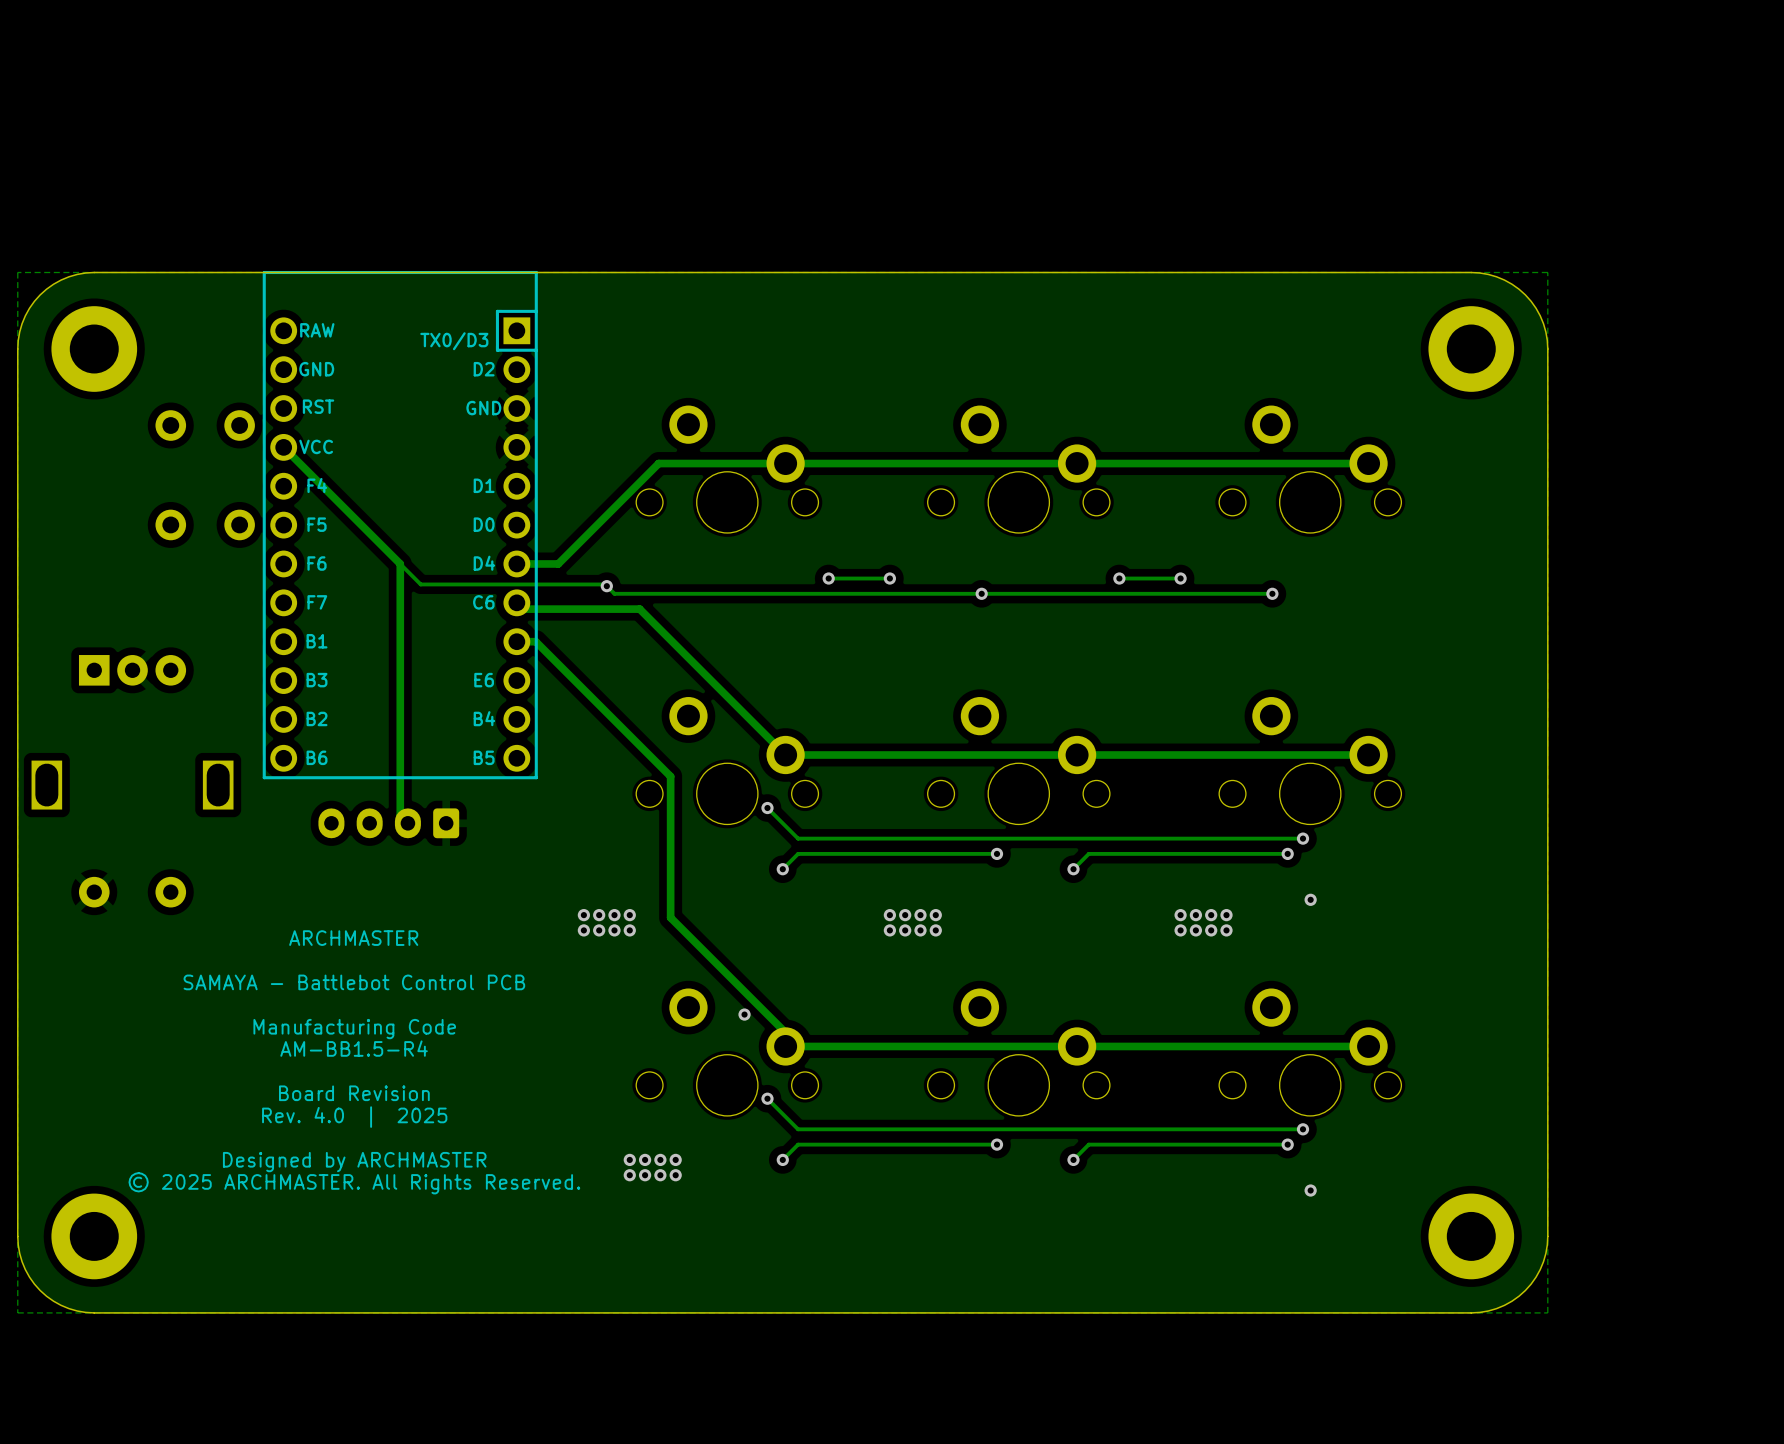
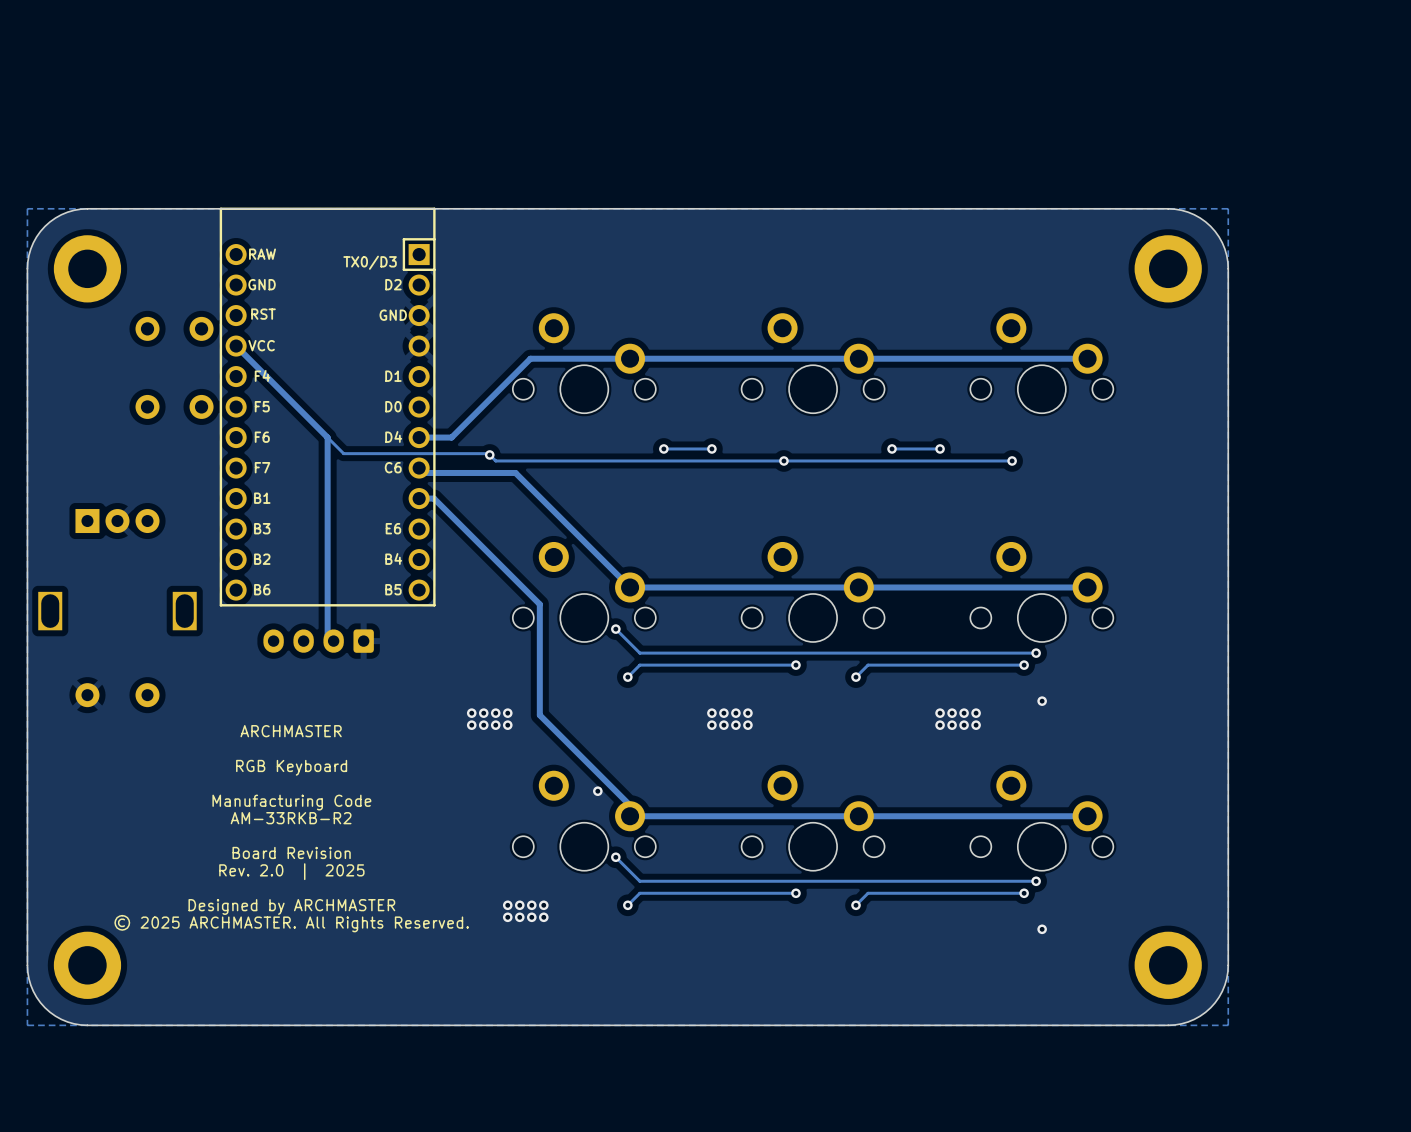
text: SAMAYA - Battlebot Control PCB (354, 982) -> RGB Keyboard (291, 767)
text: AM-BB1.5-R4 (354, 1048) -> AM-33RKB-R2 (291, 818)
text: Rev. 4.0 | 2025 (354, 1117) -> Rev. 2.0 | 2025 (291, 871)

